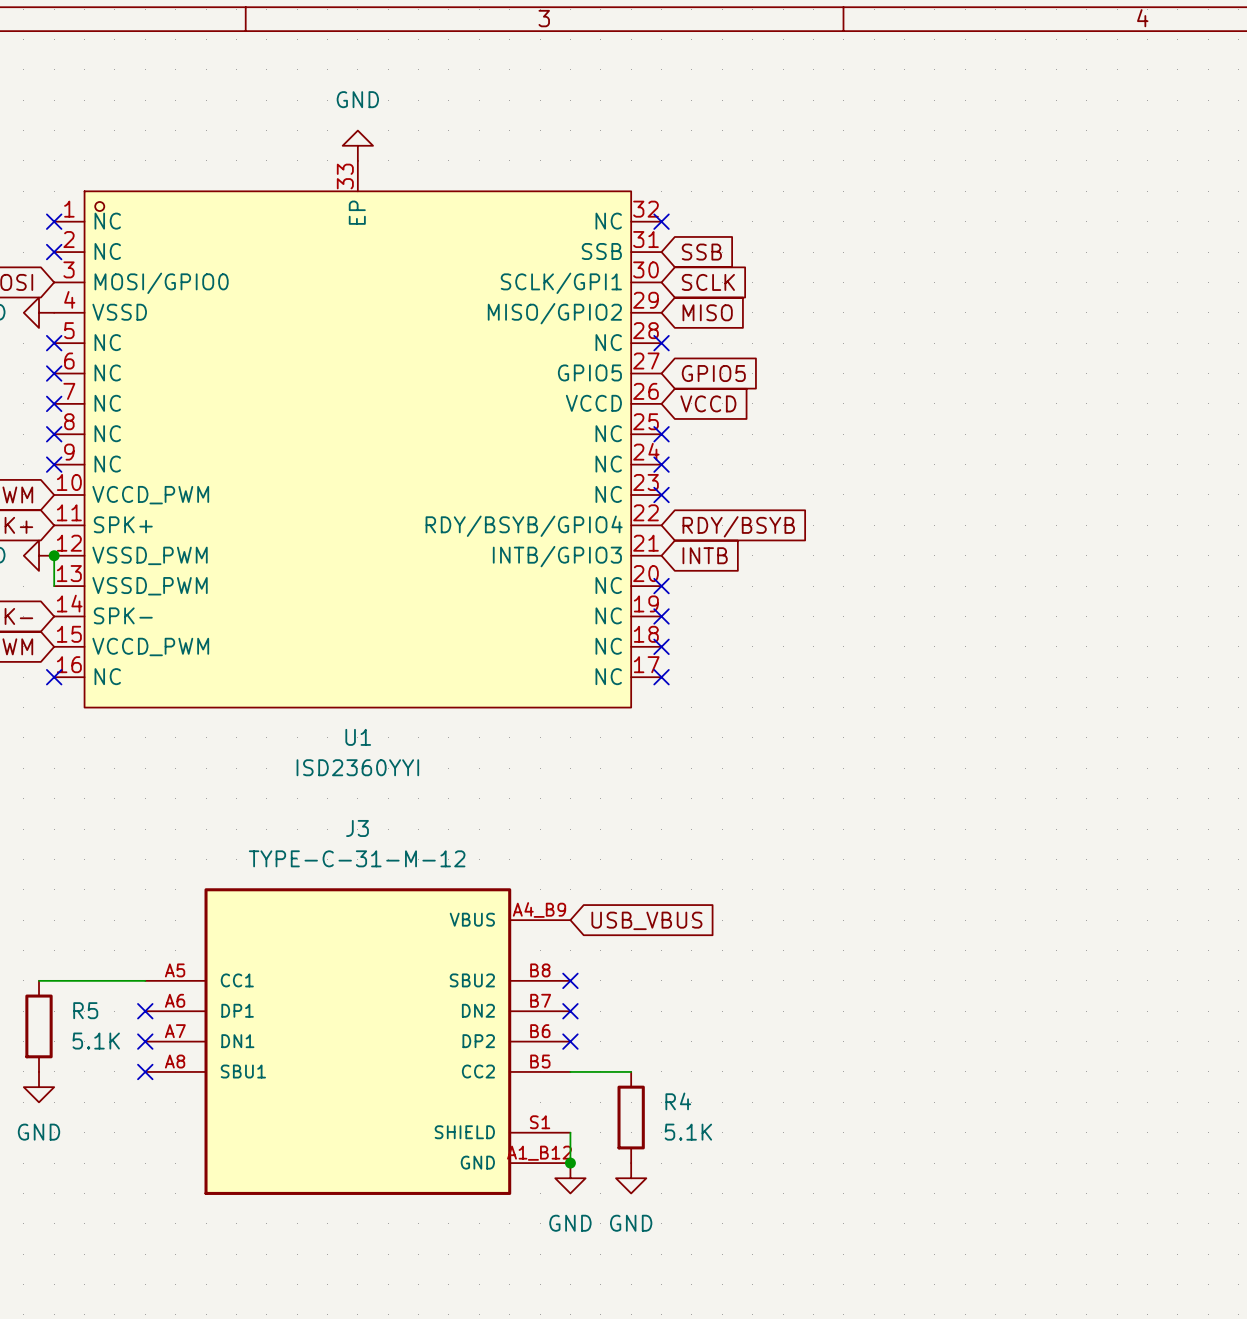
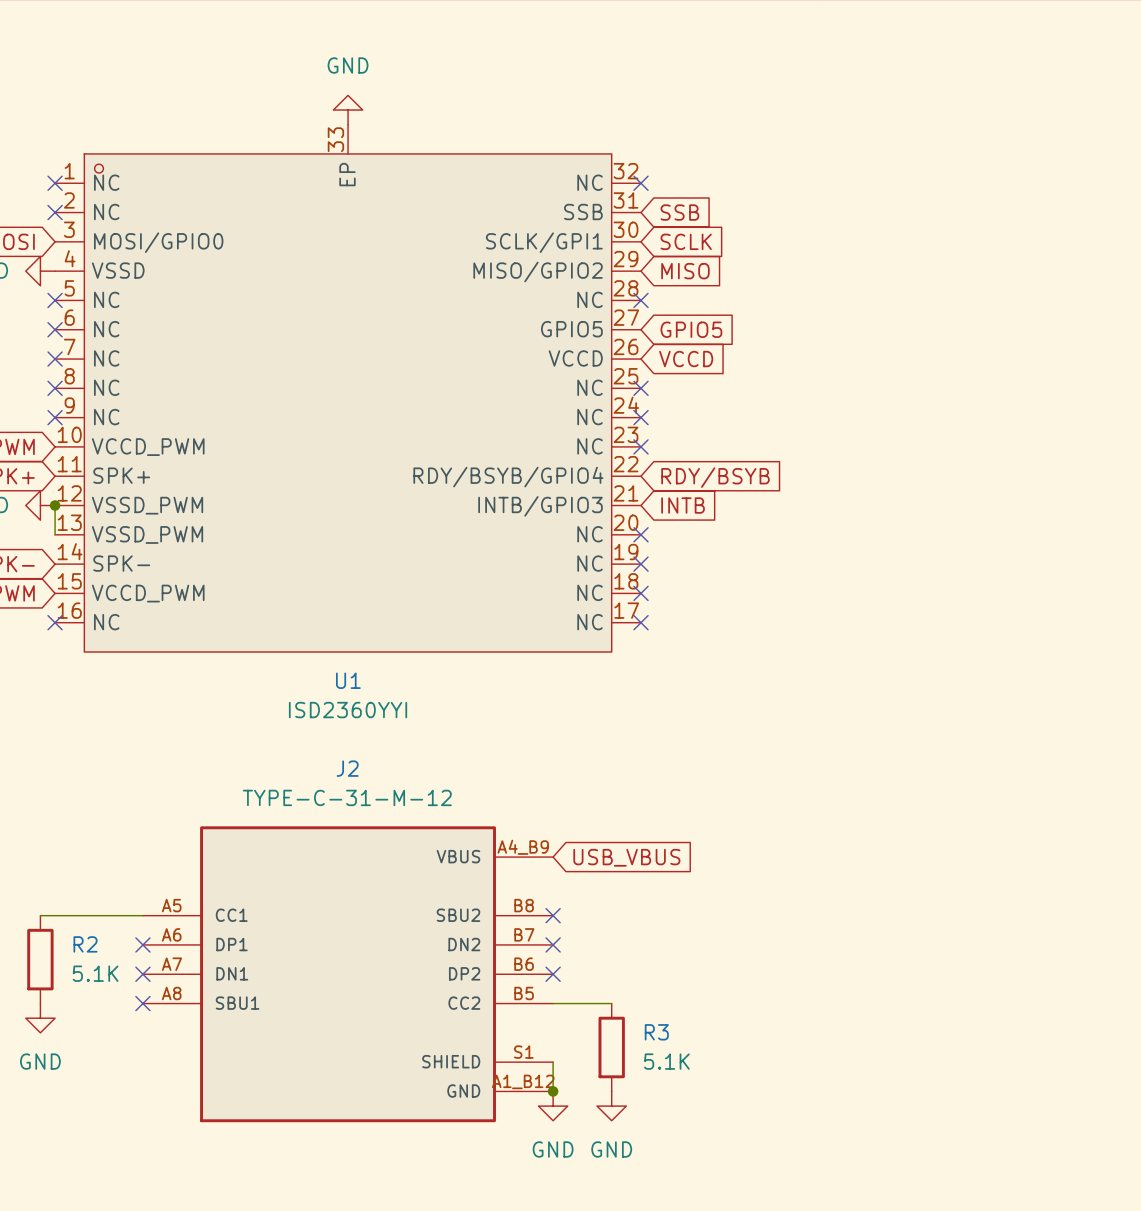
J3 name: J3 (357, 828) -> J2 (347, 768)
R5 name: R5 (85, 1010) -> R2 (85, 944)
R4 name: R4 (678, 1101) -> R3 (656, 1032)

